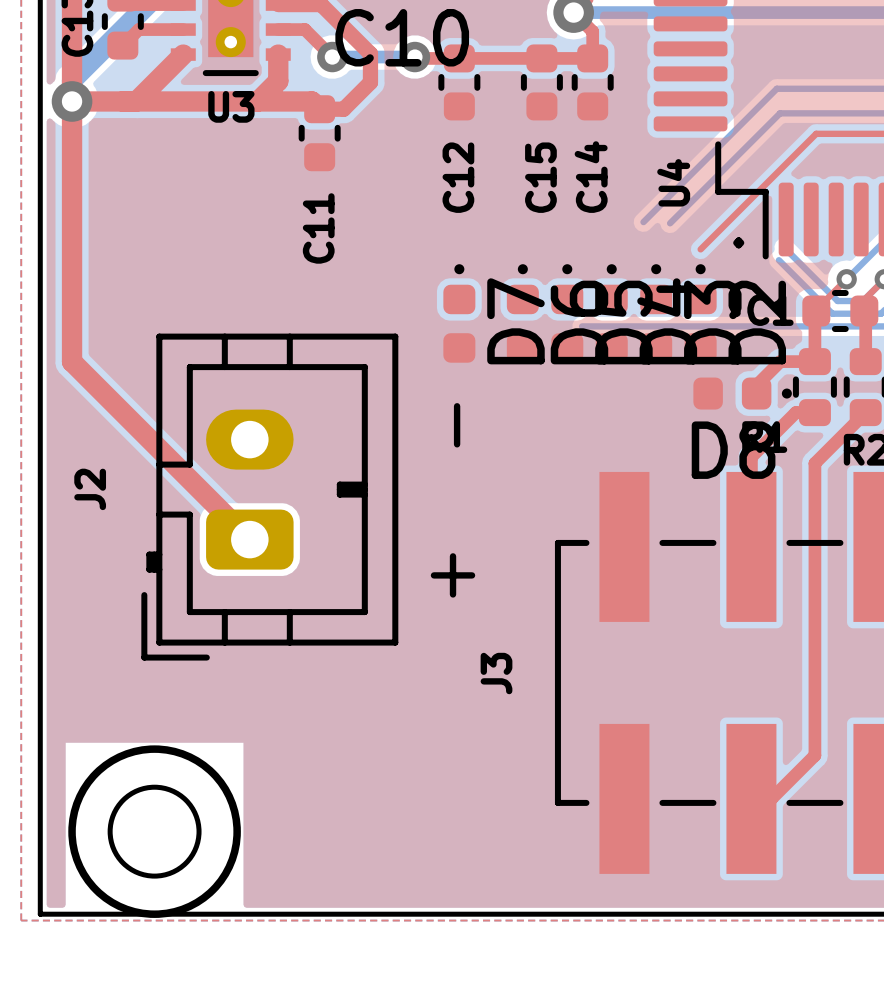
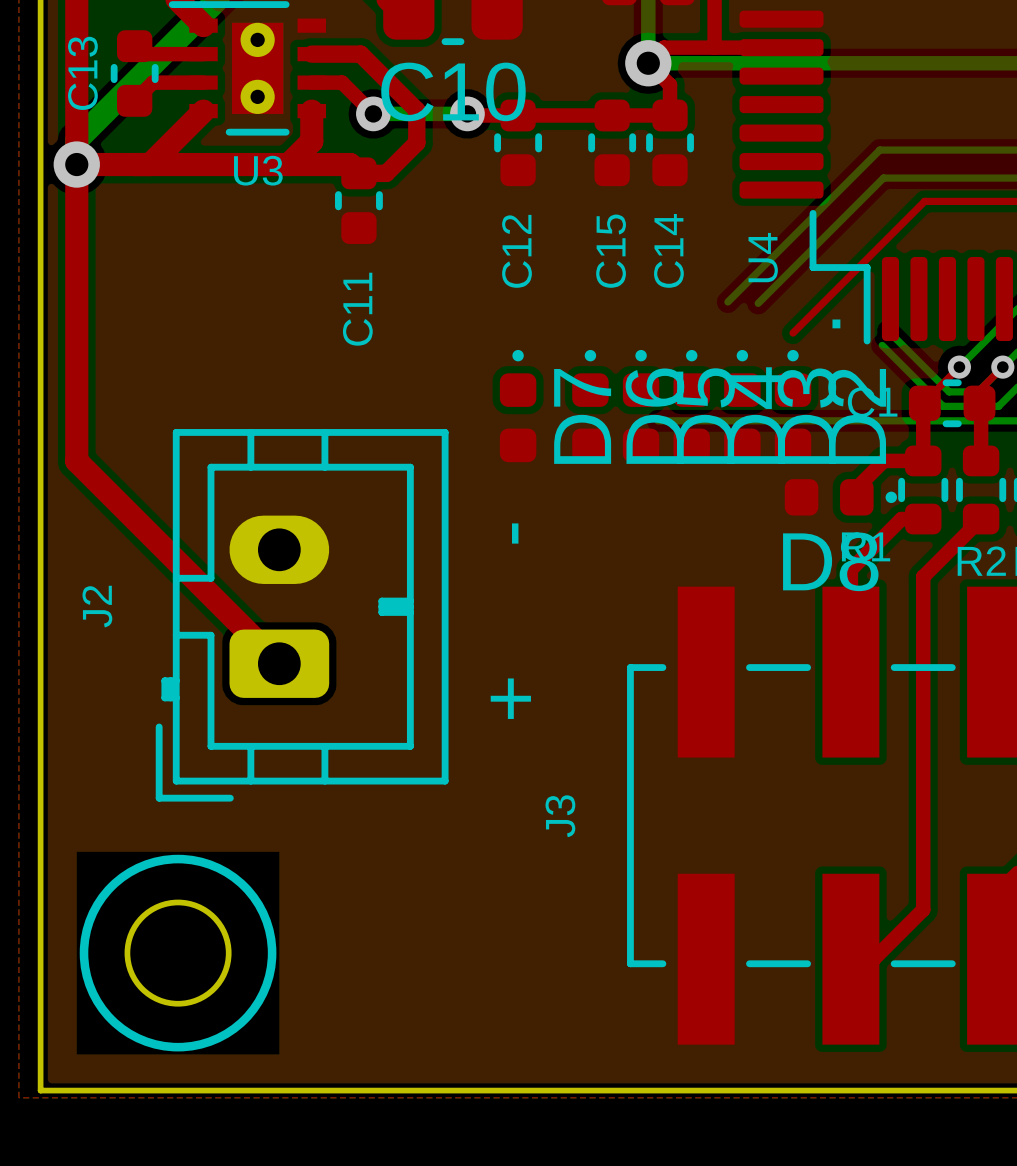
drawing position: (154, 831) -> (178, 953)
round board edge position: (154, 831) -> (178, 953)

